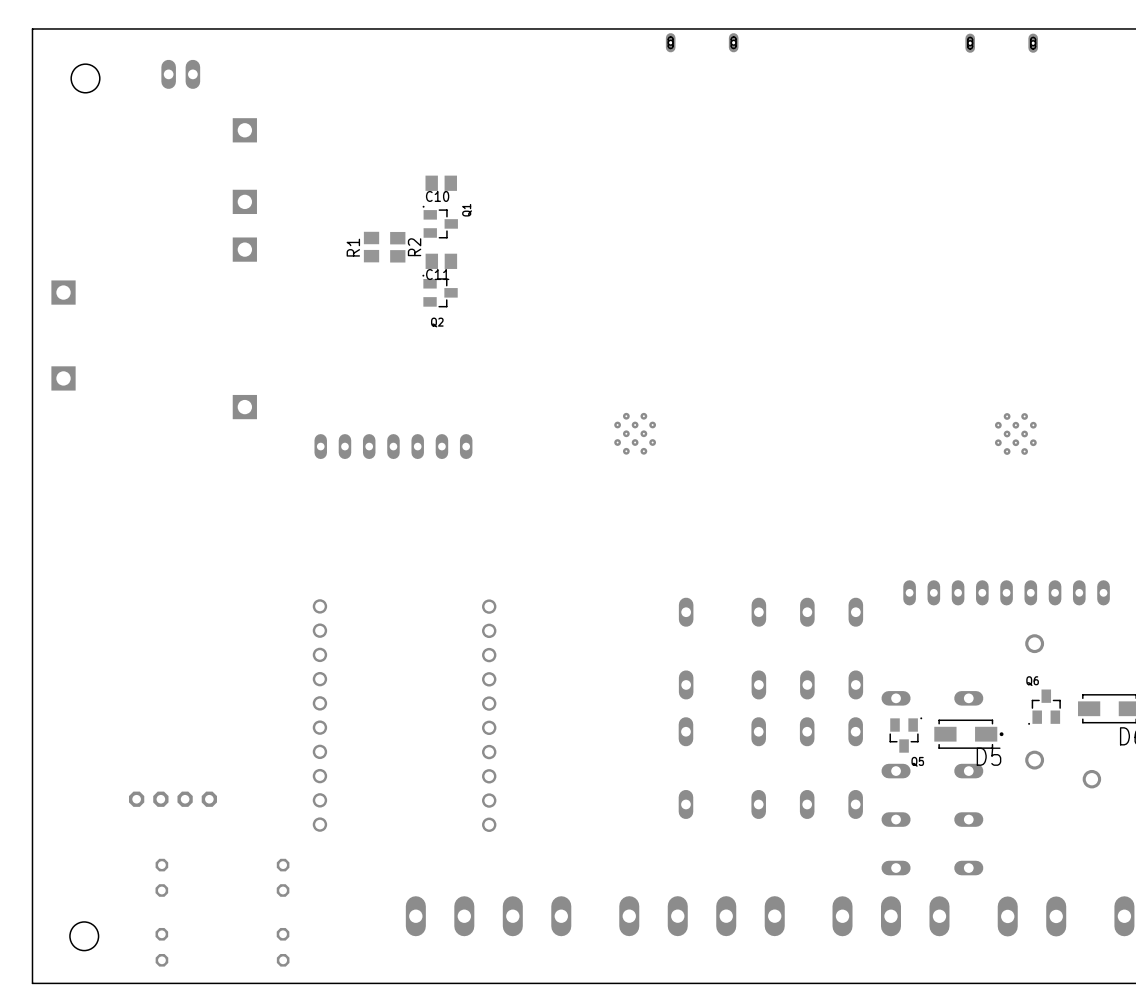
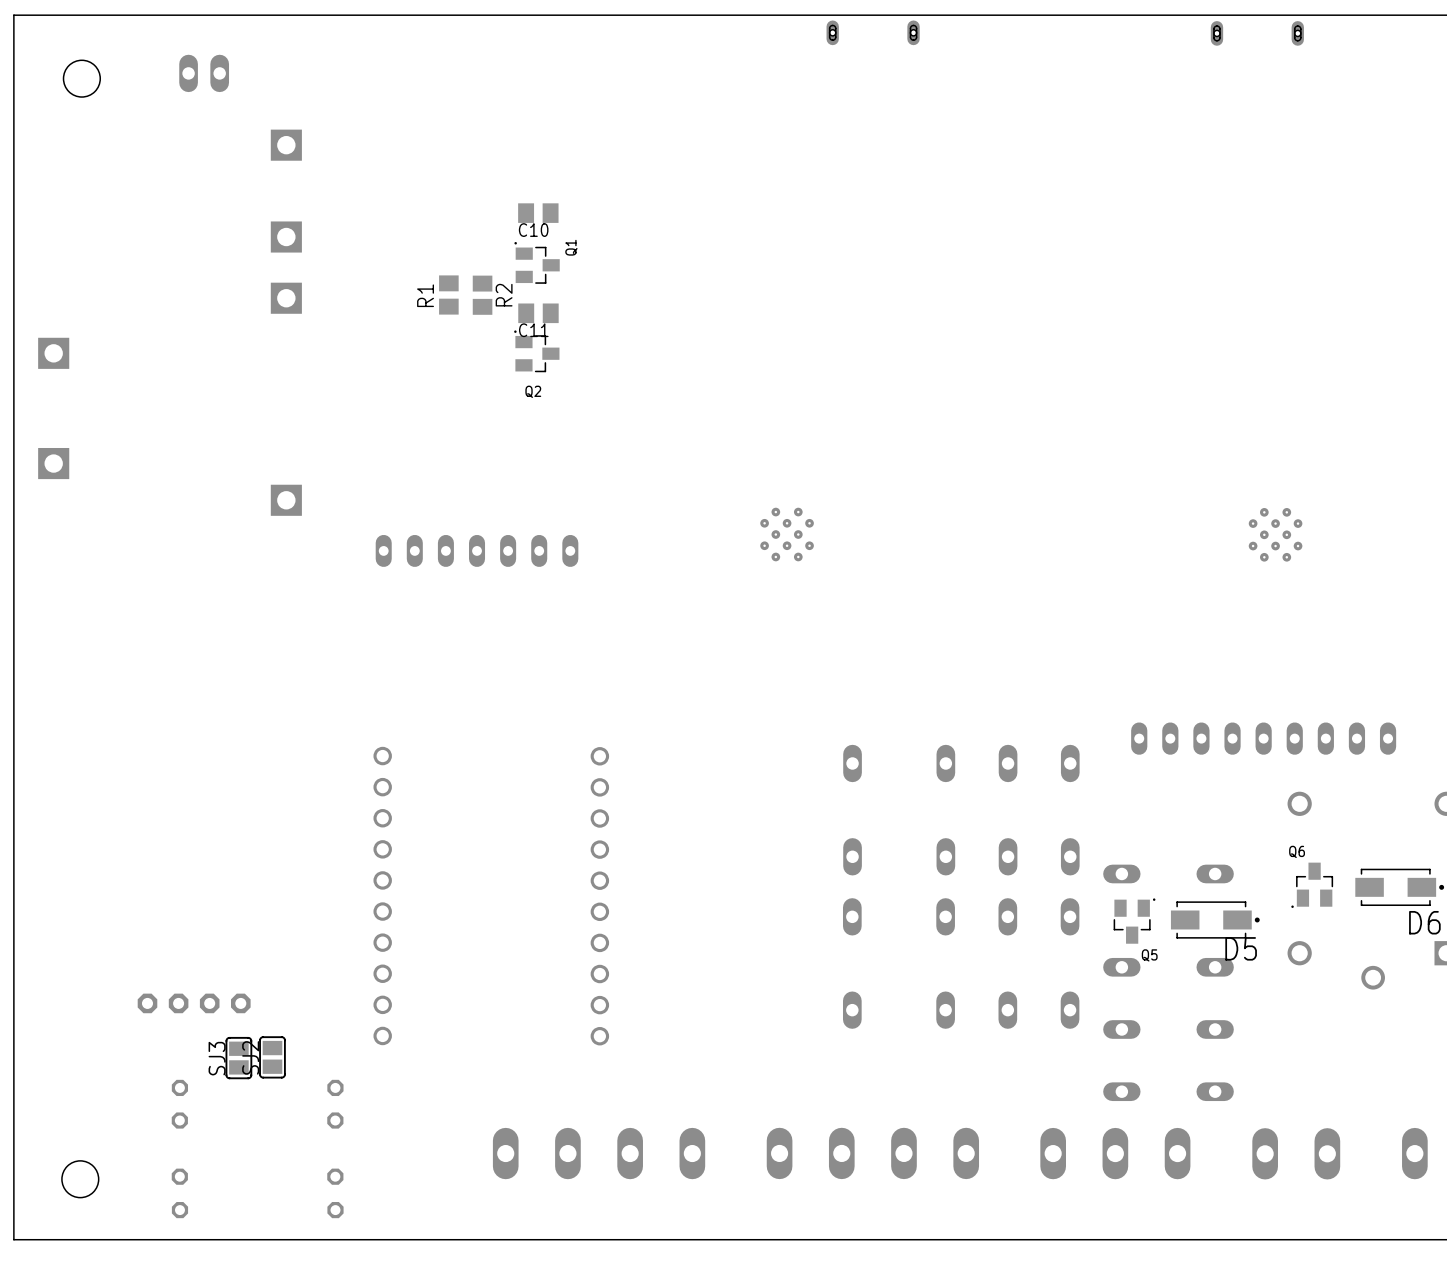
SJ3: none -> (238, 1058)
SJ2: none -> (272, 1057)

